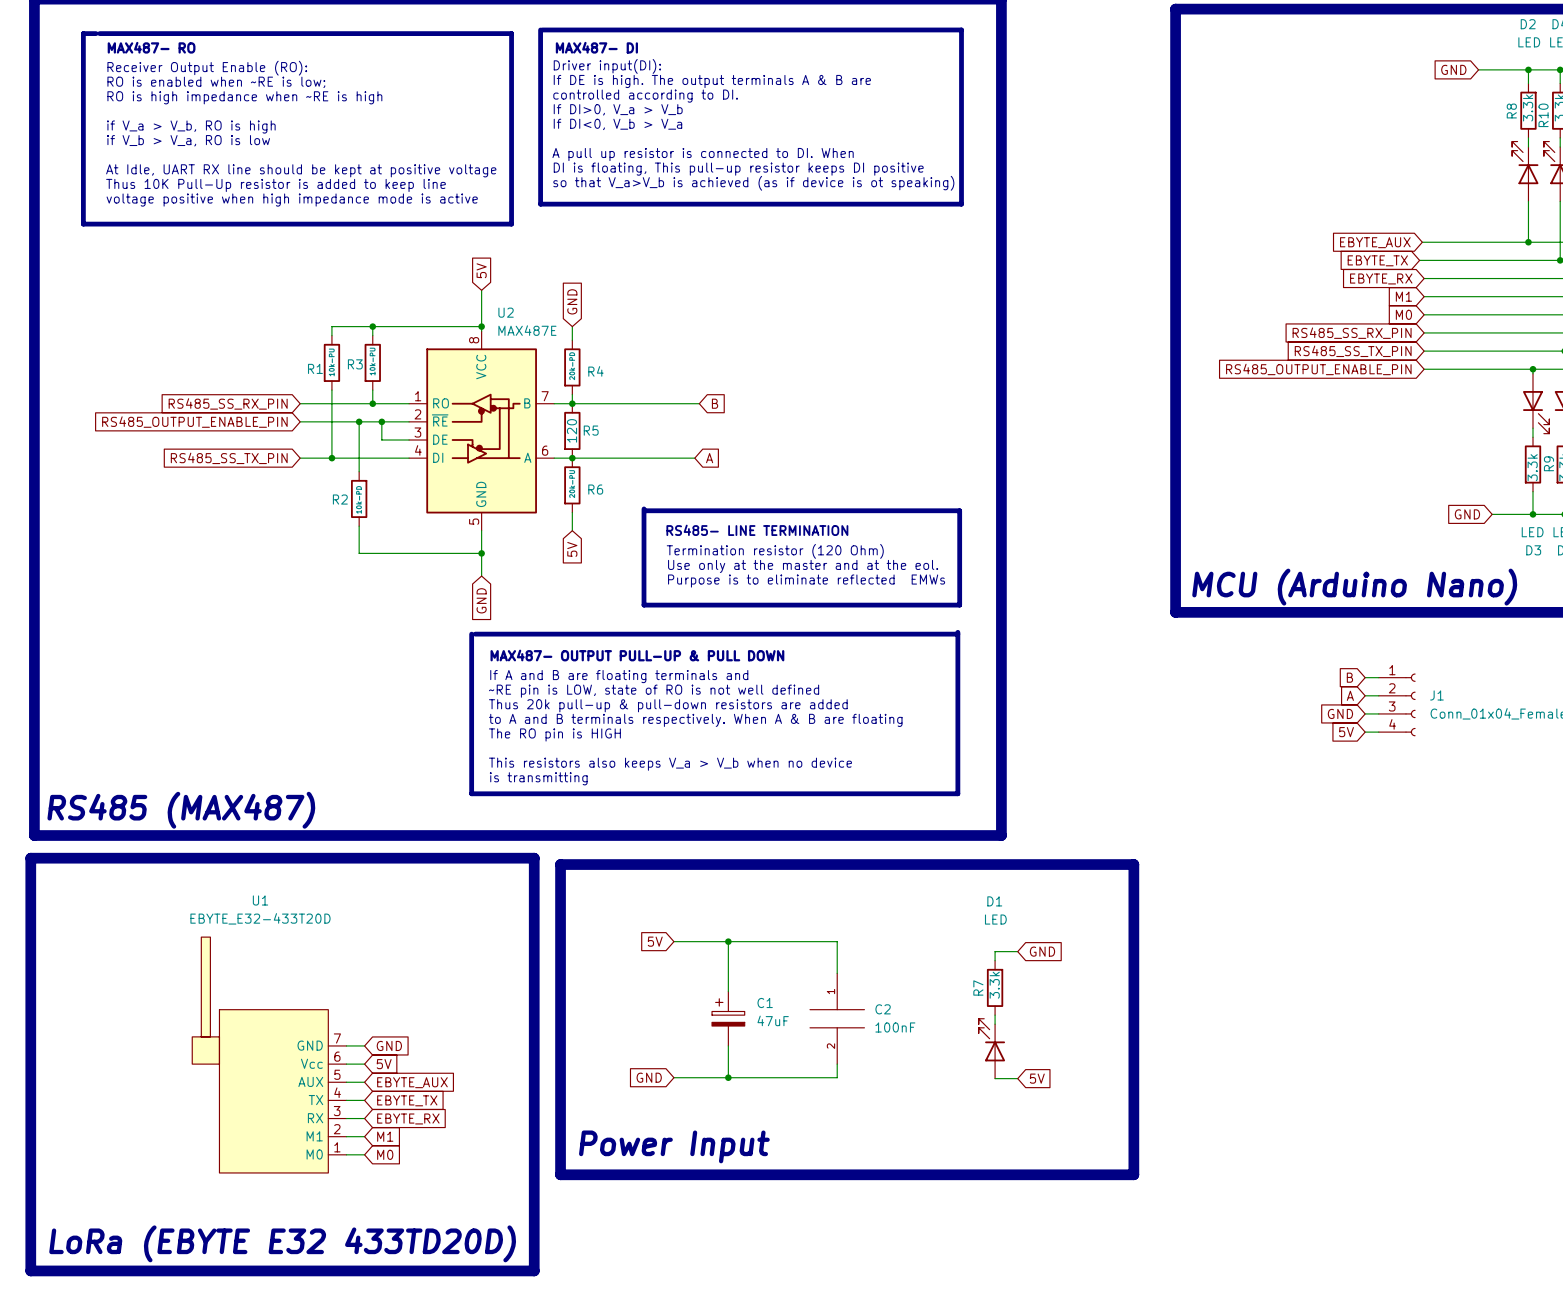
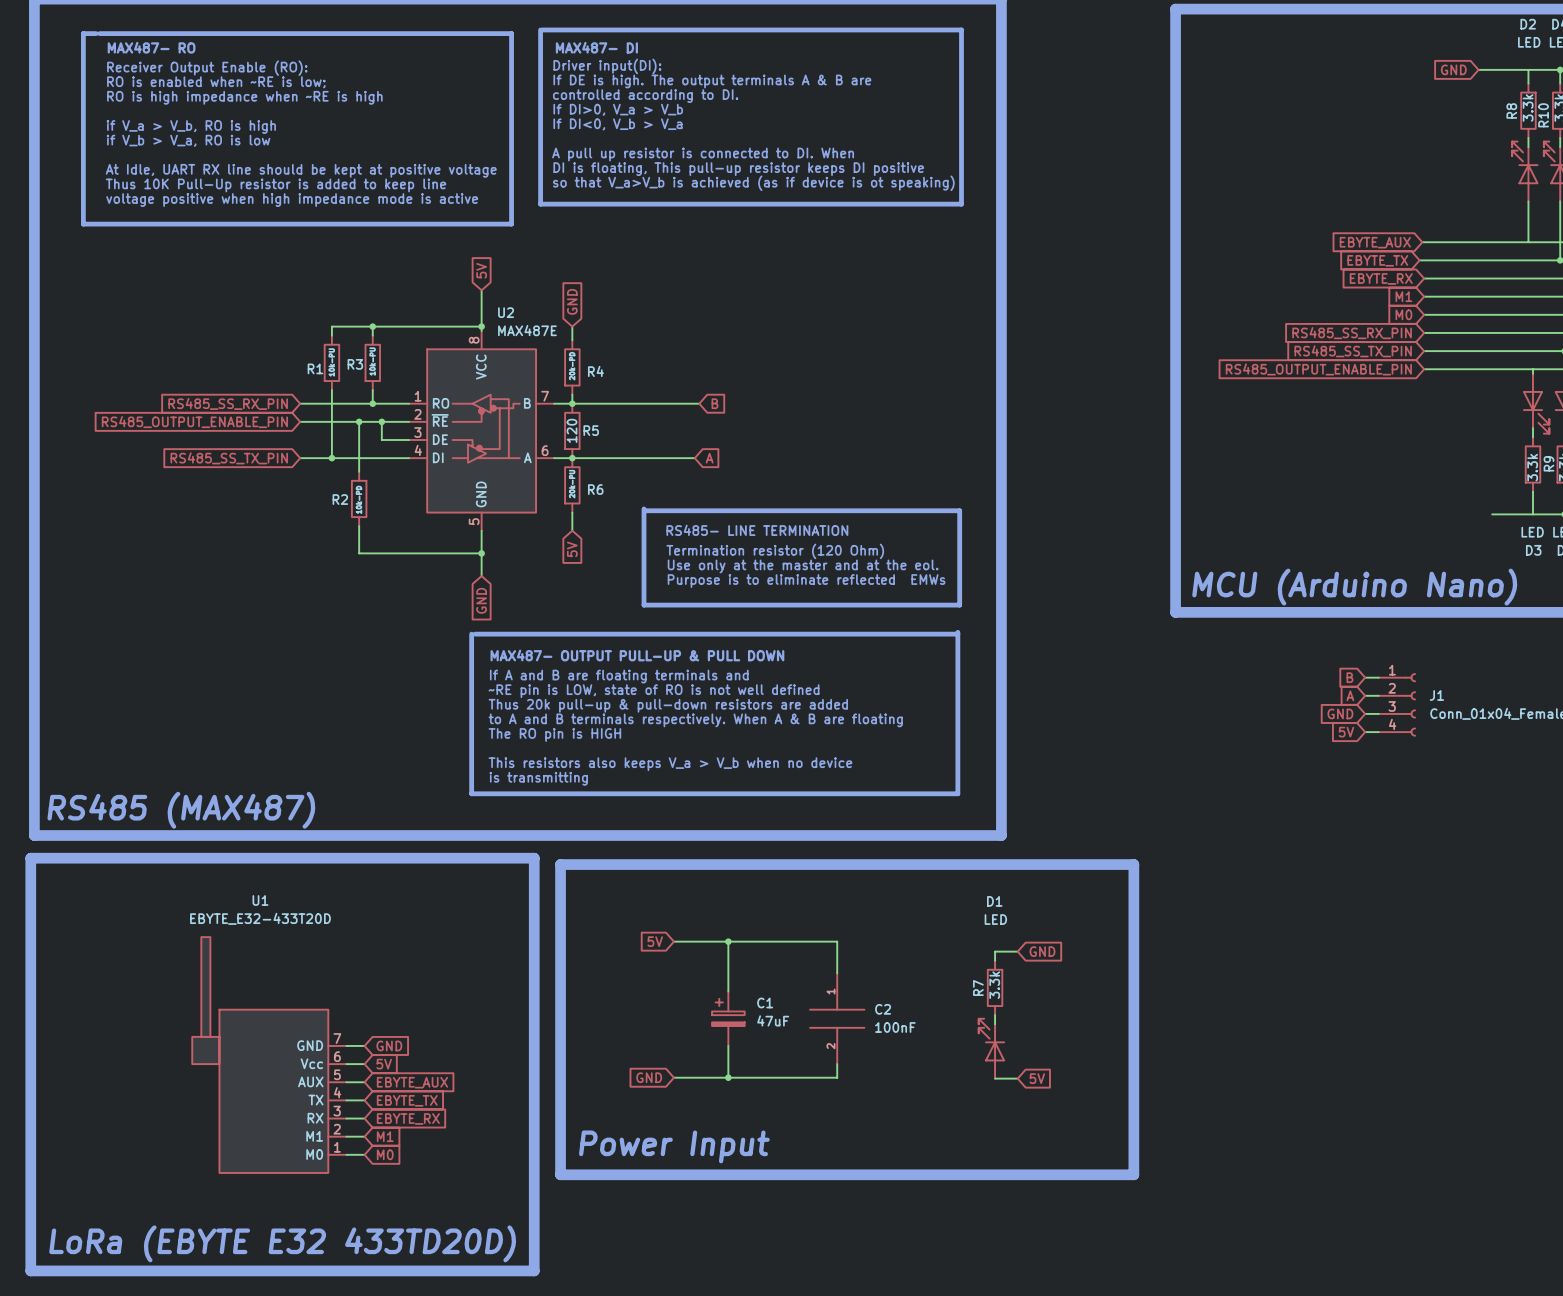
junction: (1528, 69) -> none
junction: (1528, 242) -> none
junction: (1532, 369) -> none
global label: GND (1467, 514) -> none
junction: (1532, 514) -> none

